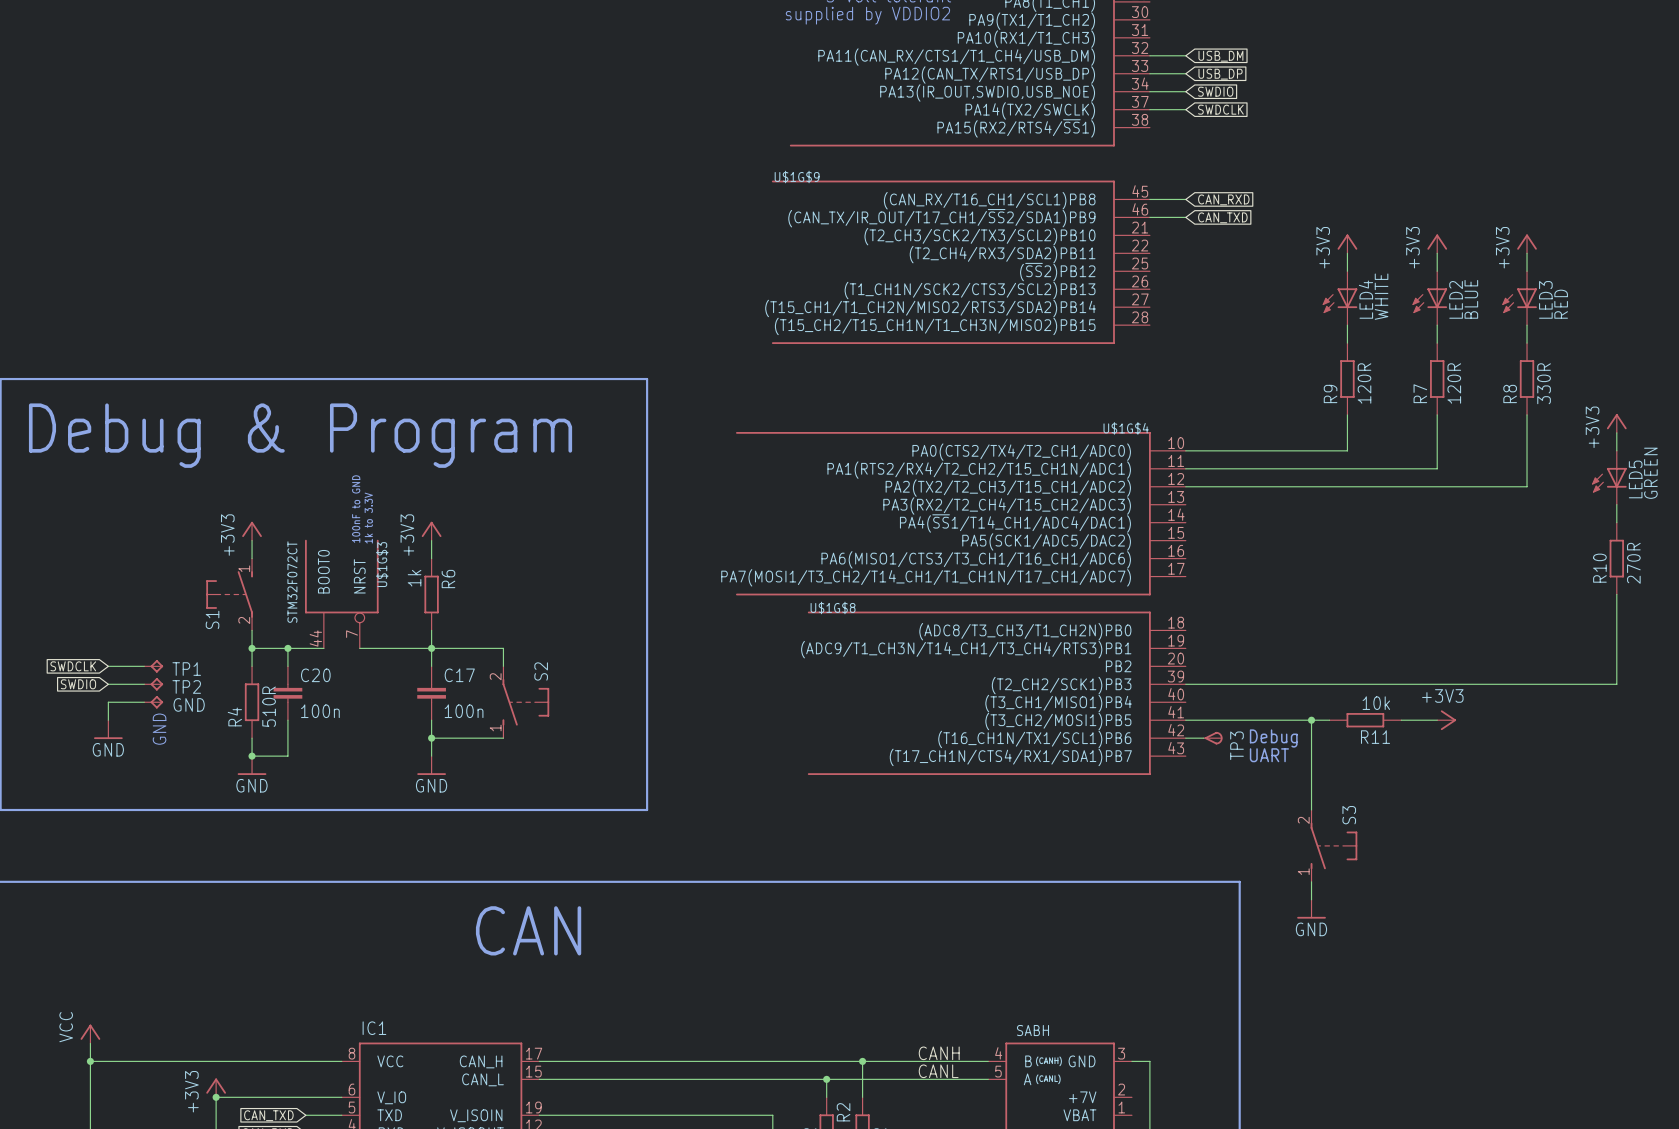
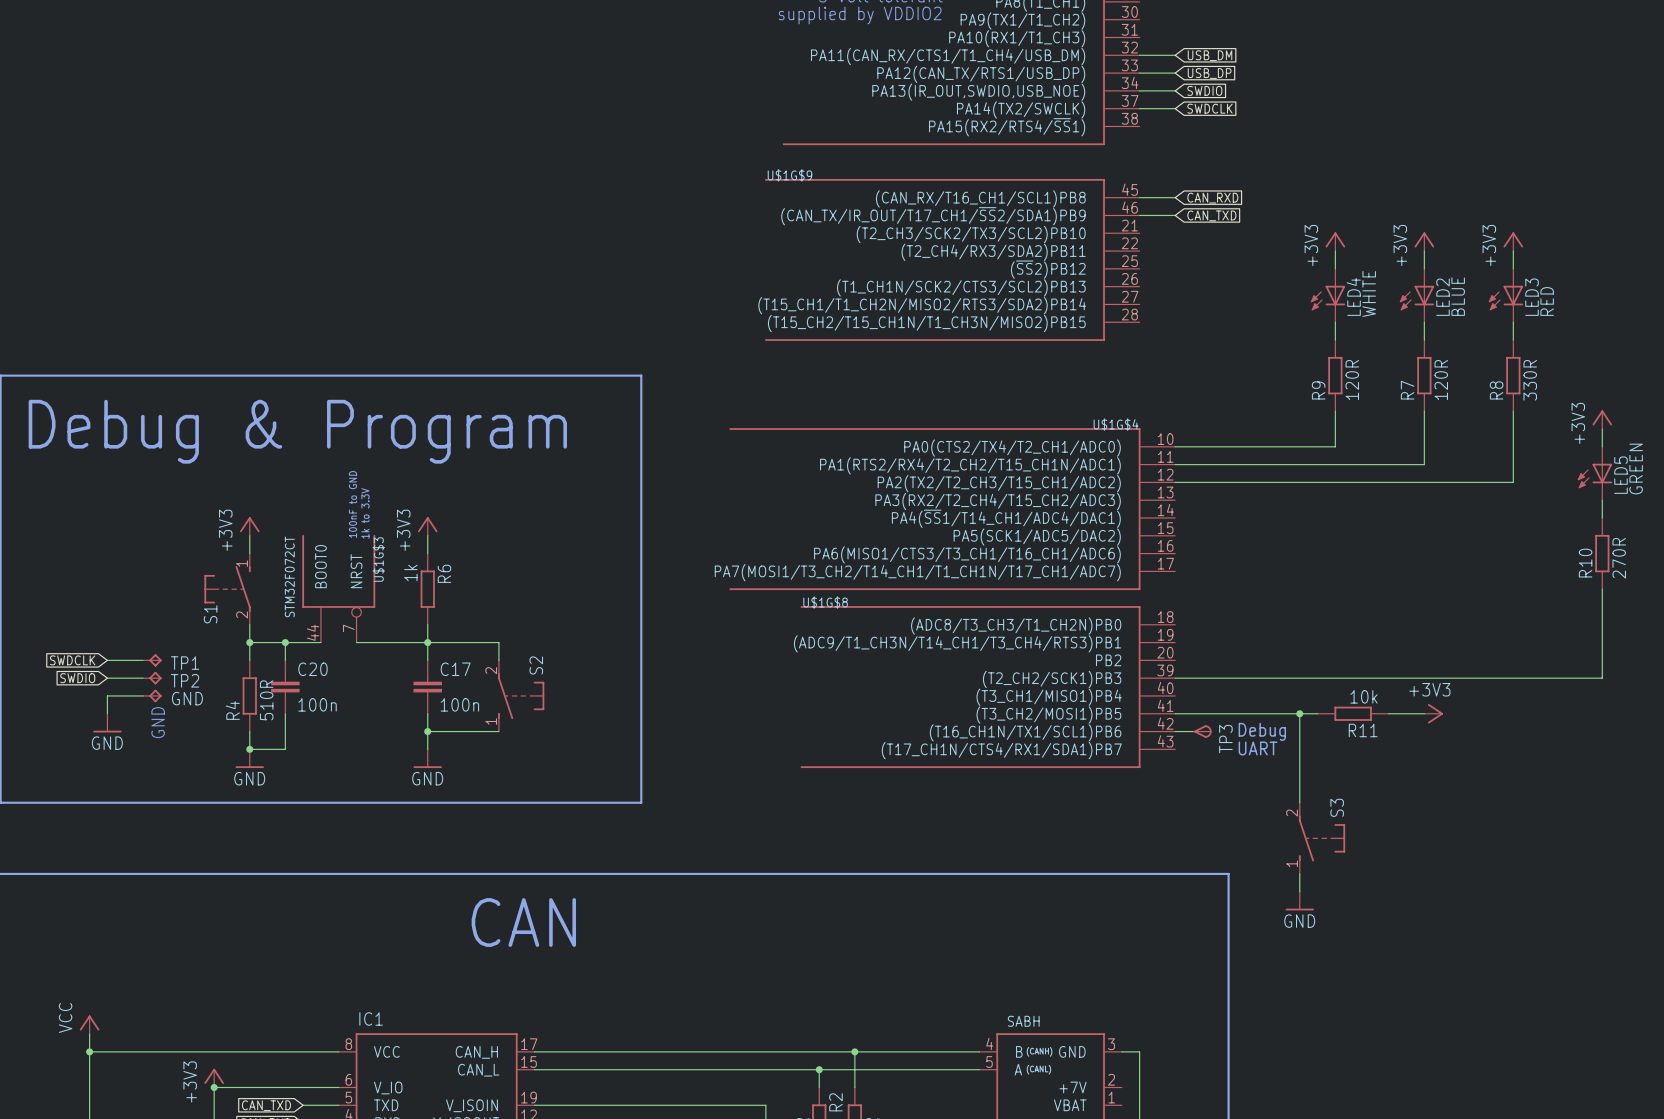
label: CANH (939, 1053) -> none
label: CANL (938, 1071) -> none

